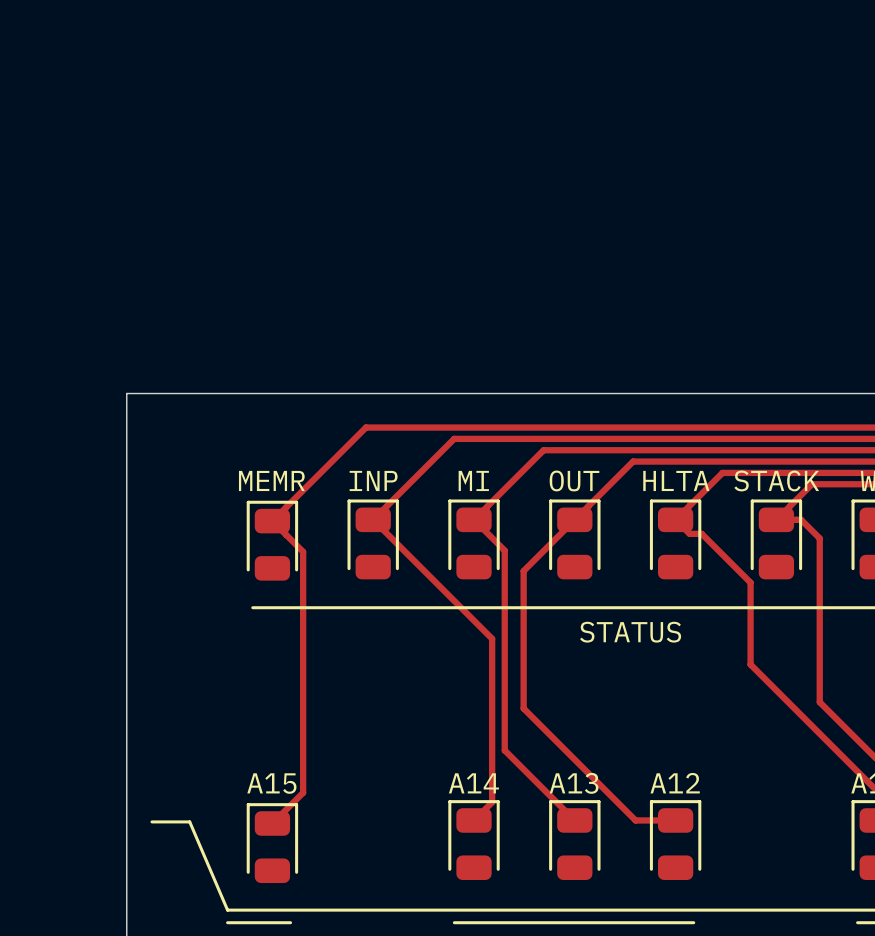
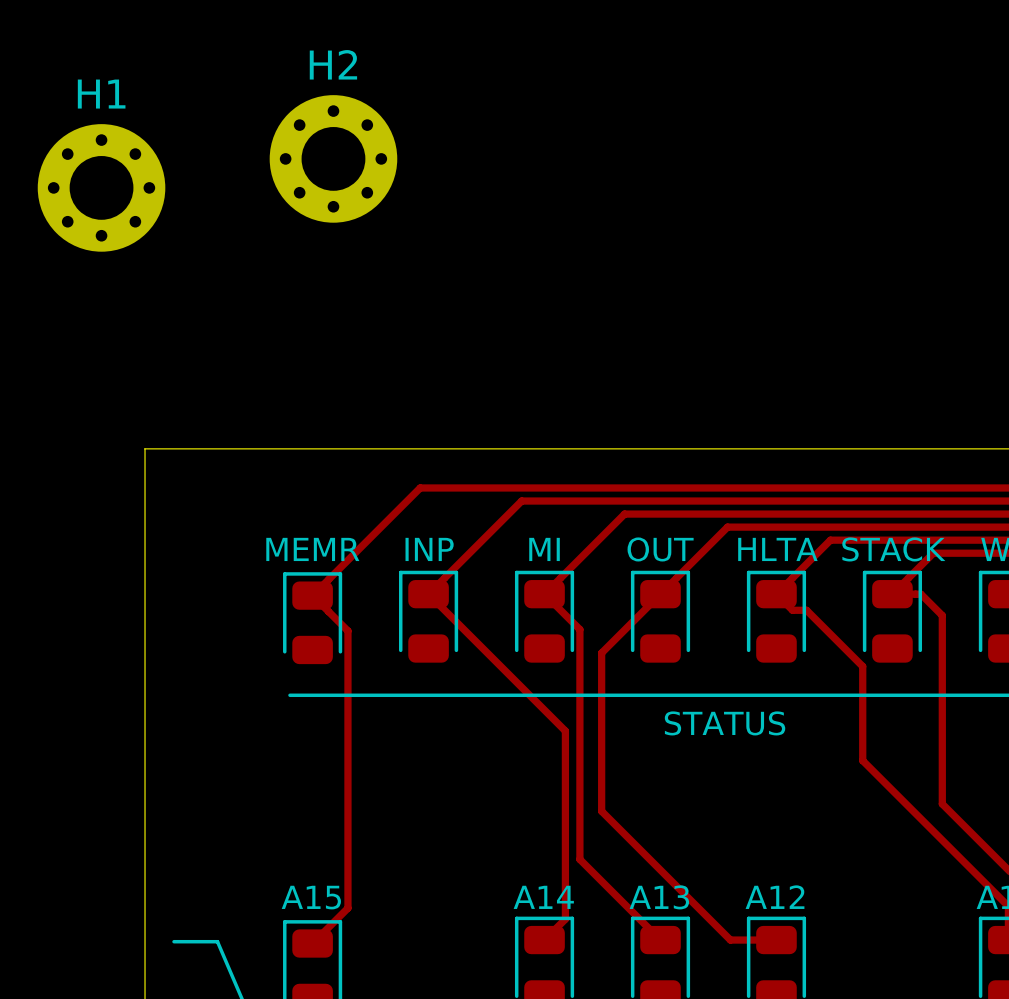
H2: none -> (333, 158)
H1: none -> (101, 187)

